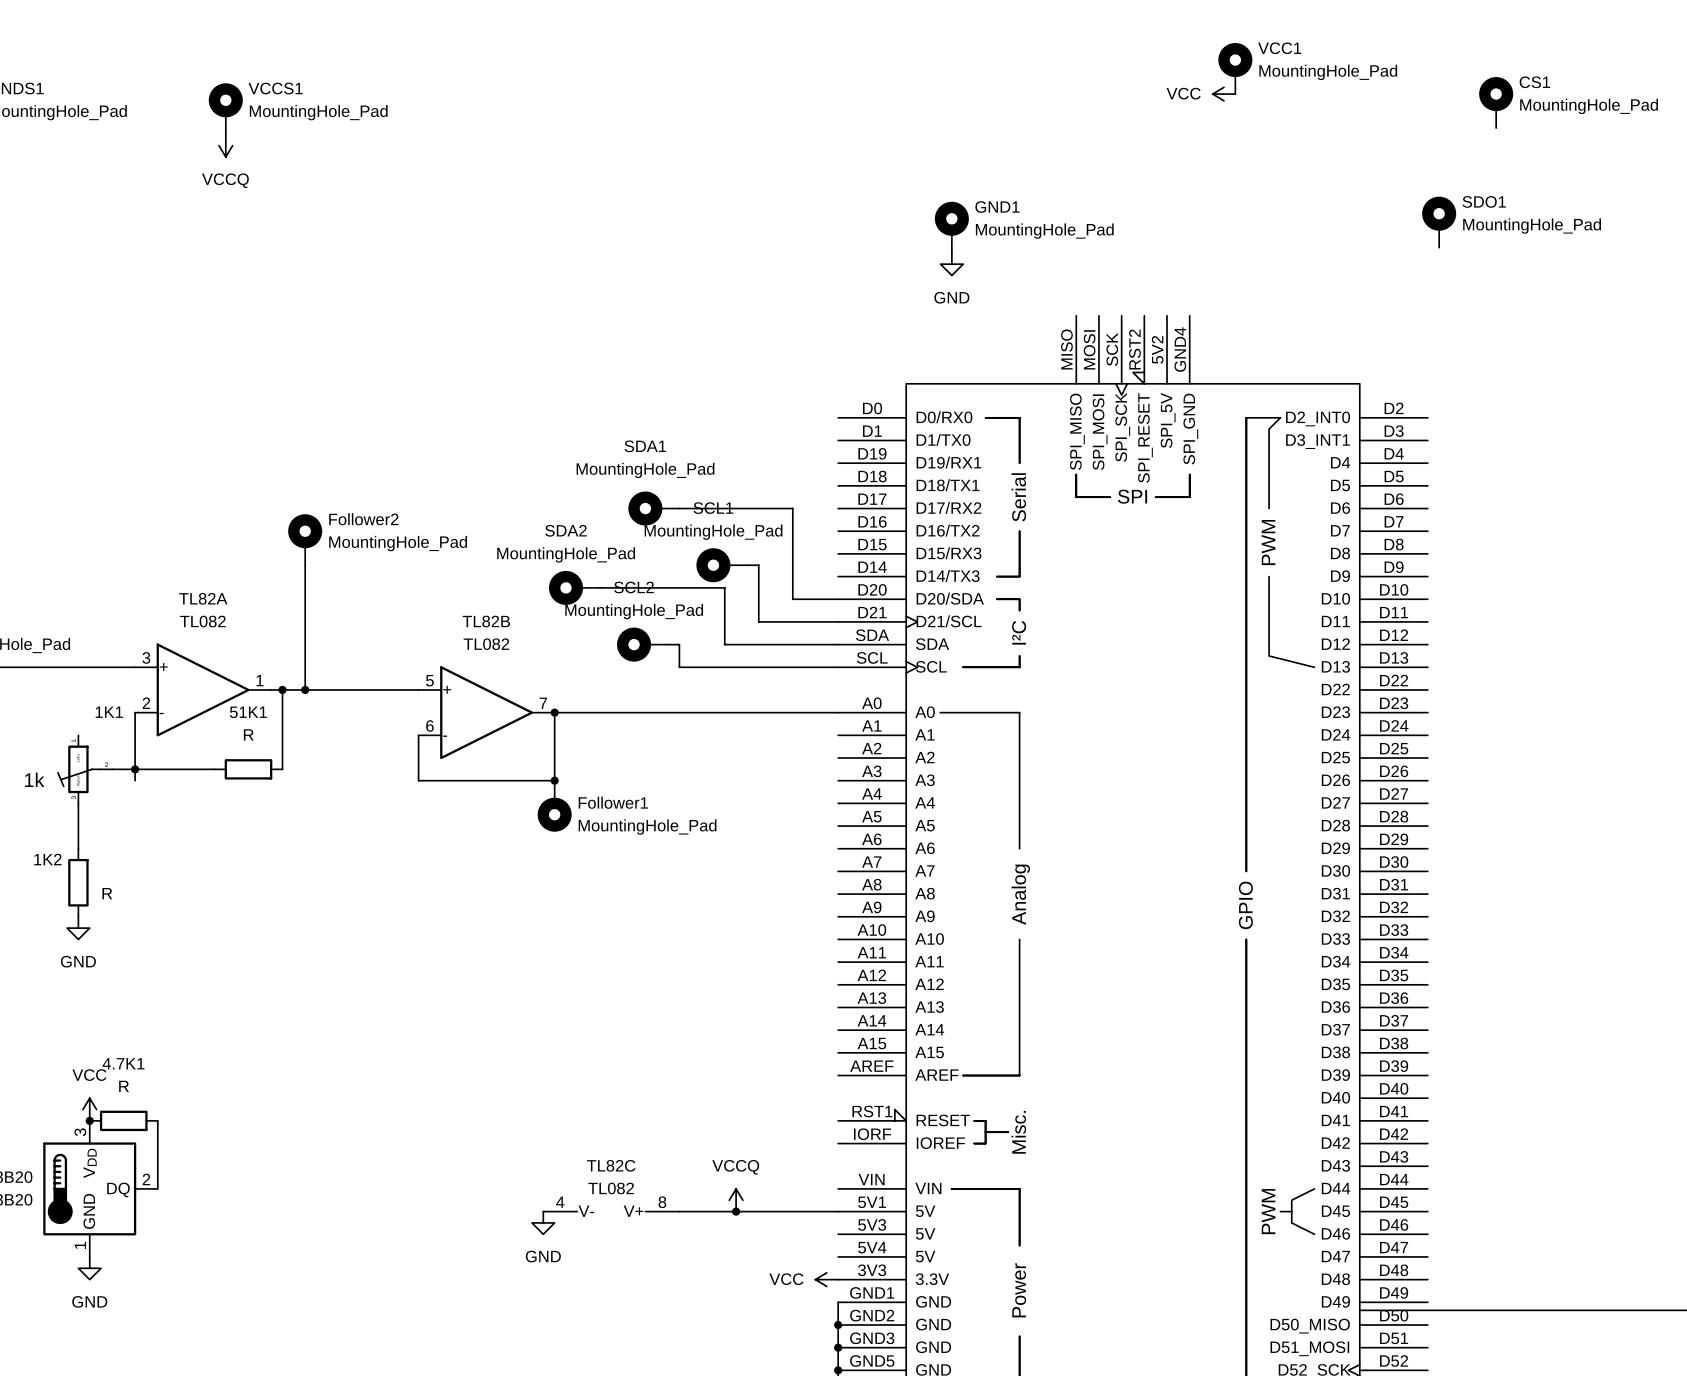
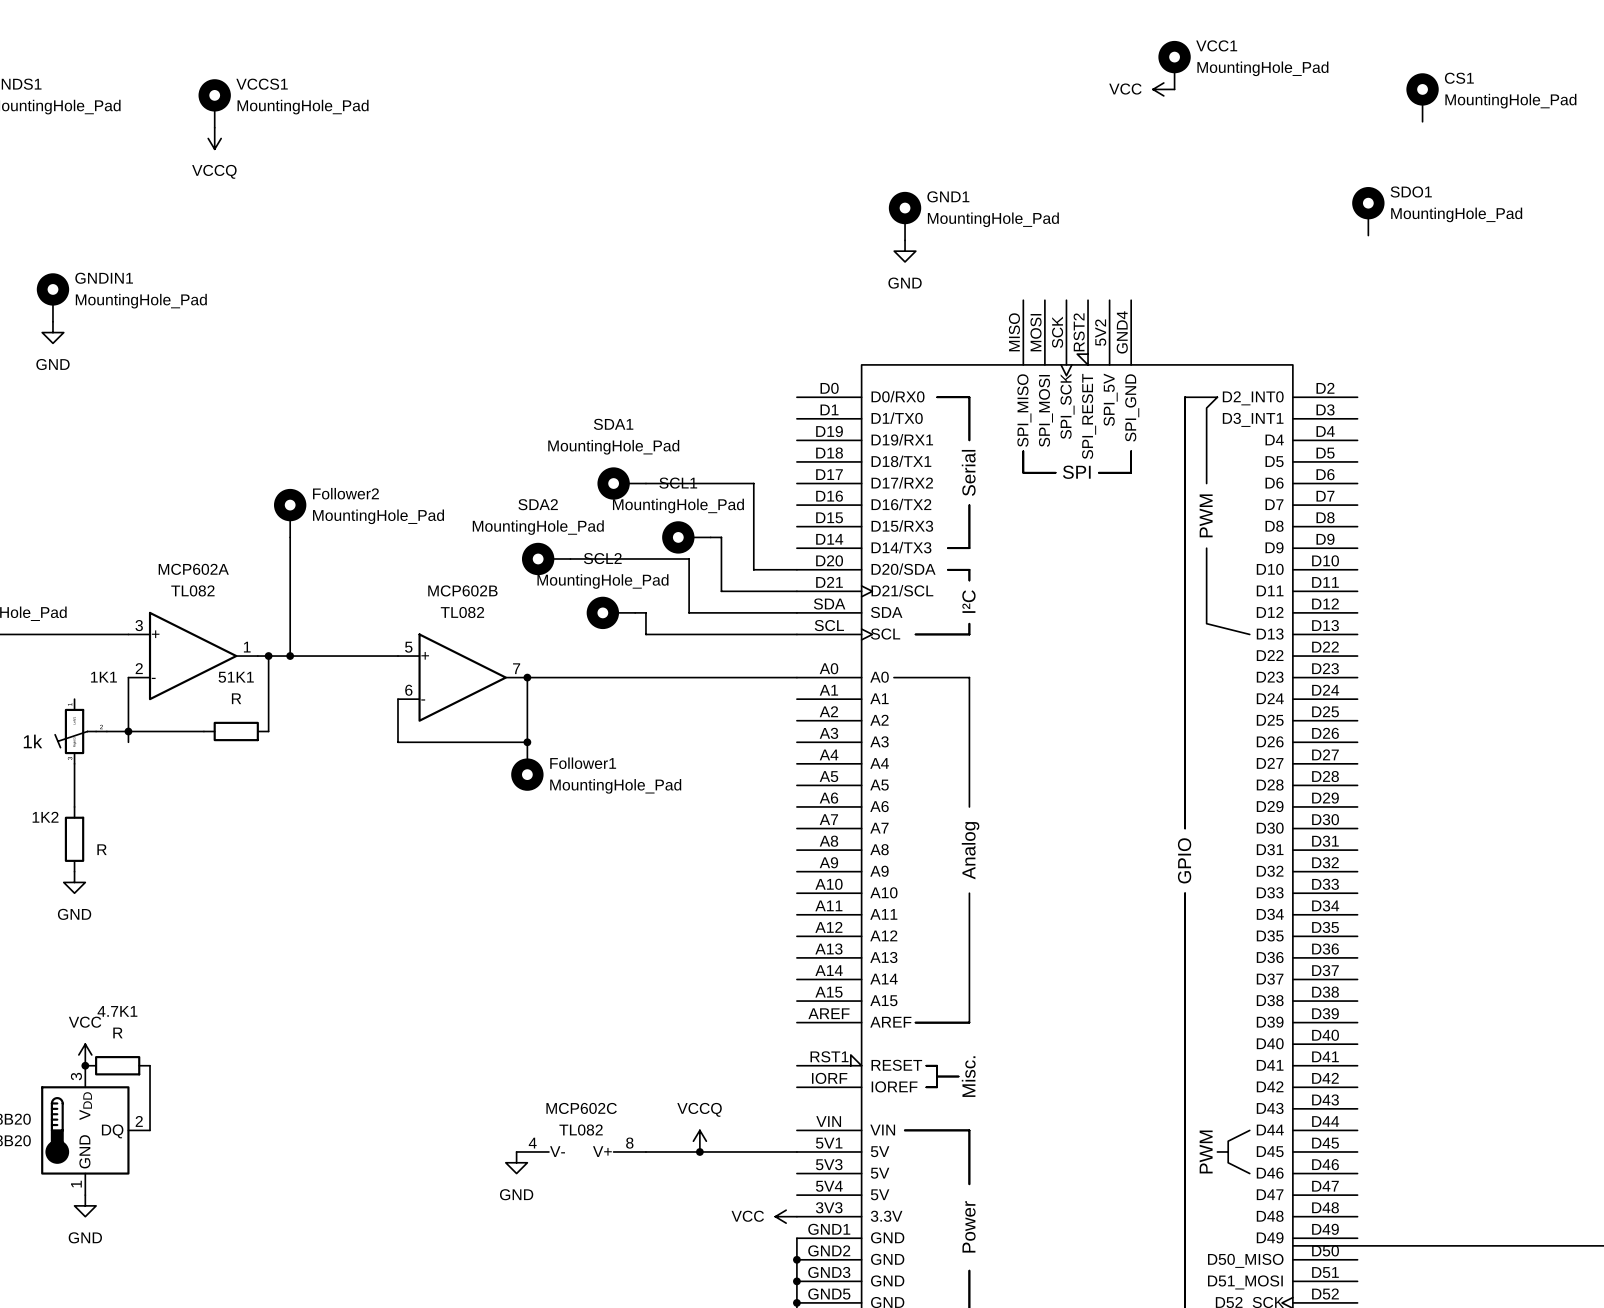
GNDIN1: none -> MountingHole_Pad (52, 297)
power symbol: none -> GND (52, 332)
TL82A name: TL82A (203, 598) -> MCP602A (193, 569)
TL82B name: TL82B (486, 621) -> MCP602B (462, 590)
TL82C name: TL82C (611, 1165) -> MCP602C (581, 1108)

